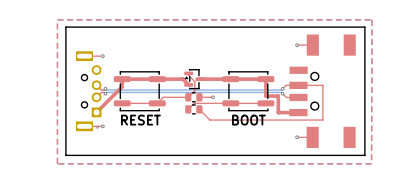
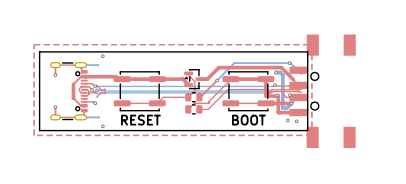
top zone outline: (57, 19) (372, 19) (371, 163) (57, 163) (57, 19) -> none
board edge: (65, 27) (364, 27) (364, 155) (65, 155) (65, 27) -> none
top zone outline: none -> (34, 44) (311, 44) (311, 135) (34, 135) (34, 44)
via: (297, 45) -> none
top track: (312, 45) (297, 45) -> none
board edge: none -> (39, 51) (307, 51) (307, 130) (39, 130) (39, 51)
top track: (84, 56) (102, 56) -> none
via: none -> (289, 63)
bottom track: none -> (80, 65) (98, 65)
top track: none -> (84, 71) (80, 68) (80, 65) (55, 65) (55, 75)
bottom track: none -> (276, 72) (280, 72) (282, 75) (282, 108) (286, 108) (296, 98) (301, 98)
via: none -> (276, 72)
bottom track: none -> (301, 74) (290, 63) (234, 63) (217, 80)
via: none -> (55, 75)
top track: (122, 79) (122, 86) (96, 112) -> (122, 79) (115, 76) (81, 76) (73, 84)
top track: (207, 79) (231, 79) -> (207, 79) (218, 67) (281, 67) (296, 83) (301, 83)
top track: none -> (84, 83) (92, 83) (95, 86)
top track: none -> (73, 84) (73, 98) (81, 105) (84, 105)
top track: none -> (274, 85) (289, 85) (293, 83) (296, 86) (301, 86)
bottom track: none -> (274, 85) (95, 86)
via: none -> (274, 85)
via: none -> (95, 86)
bottom track: (105, 88) (282, 88) -> none
via: (105, 88) -> none
top track: (282, 88) (286, 85) (322, 85) (322, 120) (210, 120) (199, 109) -> (301, 89) (270, 91) (227, 89) (208, 109) (199, 109)
via: (282, 88) -> none
top track: none -> (84, 89) (89, 91) (87, 95) (84, 95)
top track: none -> (92, 89) (88, 86) (81, 86) (79, 90) (84, 92)
bottom track: none -> (92, 89) (95, 93) (267, 94)
via: none -> (92, 89)
bottom track: none -> (267, 89) (97, 90)
top track: none -> (97, 90) (94, 92) (89, 92)
via: none -> (97, 90)
part: none -> (68, 91)
part: (88, 91) -> none
top track: none -> (301, 92) (272, 91) (267, 94)
bottom track: (105, 93) (282, 93) -> none
via: (105, 93) -> none
via: (282, 93) -> none
via: none -> (277, 95)
via: none -> (289, 95)
top track: (200, 97) (212, 97) -> (200, 97) (217, 80)
via position: (212, 97) -> (217, 80)
top track: none -> (84, 101) (95, 103) (93, 101)
via: none -> (95, 103)
top track: (208, 103) (231, 103) -> (208, 103) (231, 79)
top track: none -> (265, 103) (291, 103)
via: none -> (291, 103)
top track: none -> (55, 107) (55, 117) (80, 117) (84, 113) (84, 110)
via: none -> (55, 107)
bottom track: none -> (80, 117) (99, 117)
via: none -> (287, 120)
via: none -> (296, 121)
top track: (84, 126) (102, 126) -> none
top track: (297, 137) (312, 137) -> none
via: (297, 137) -> none

